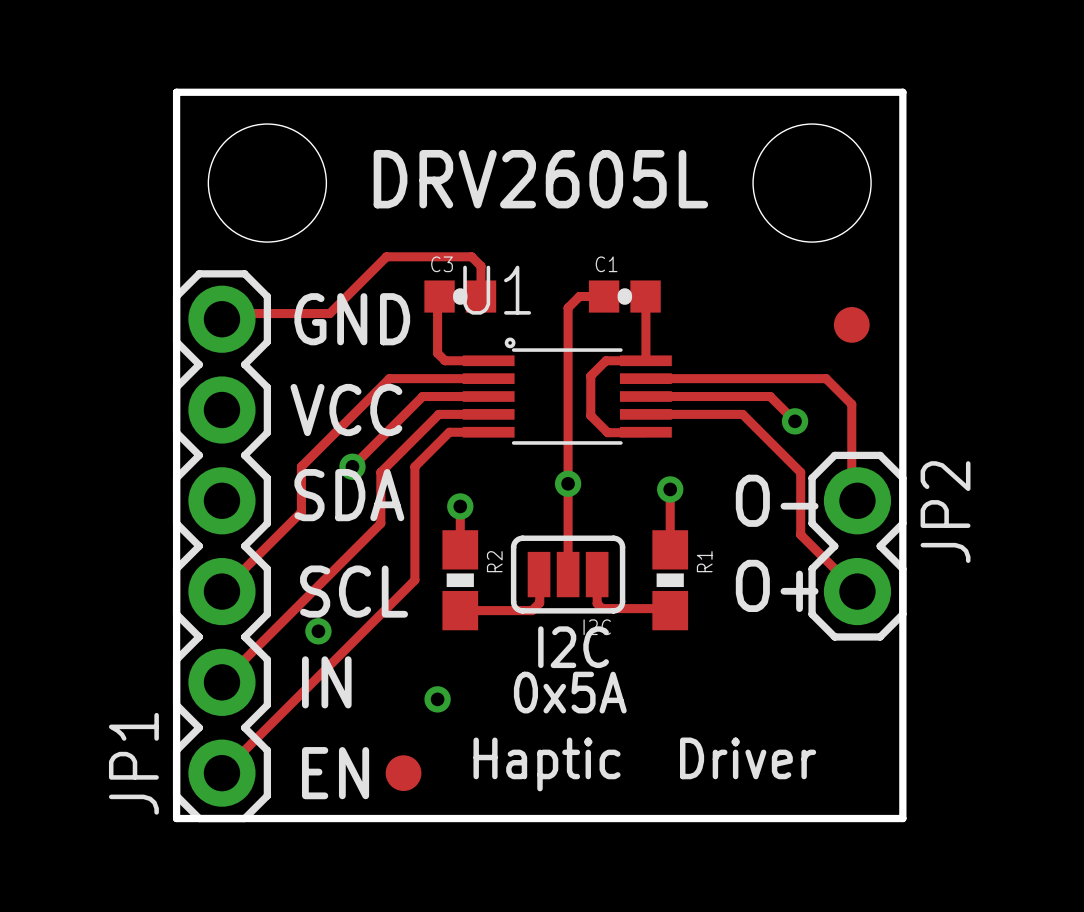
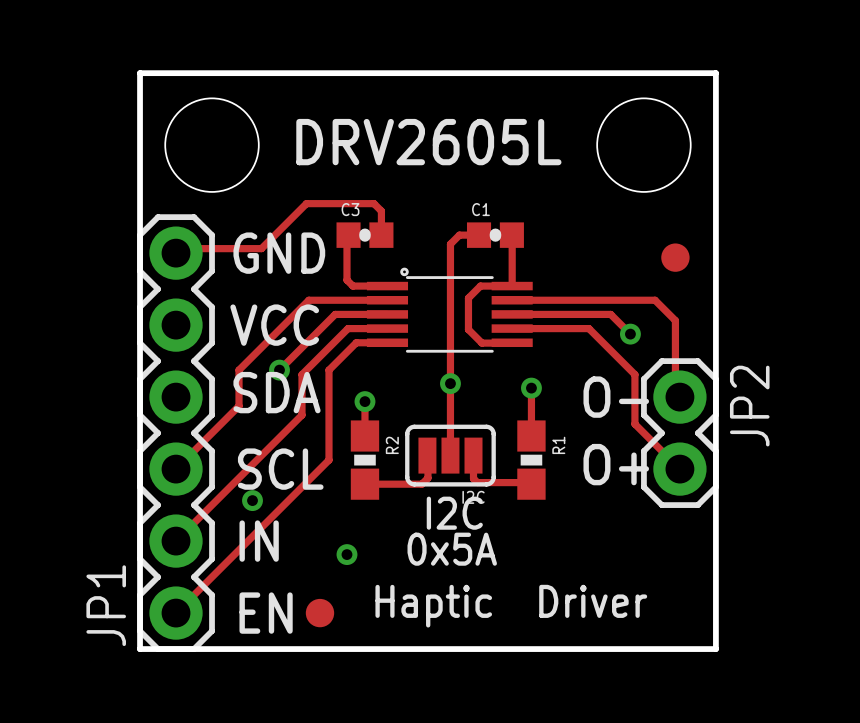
U1 name: U1 (497, 290) -> none

